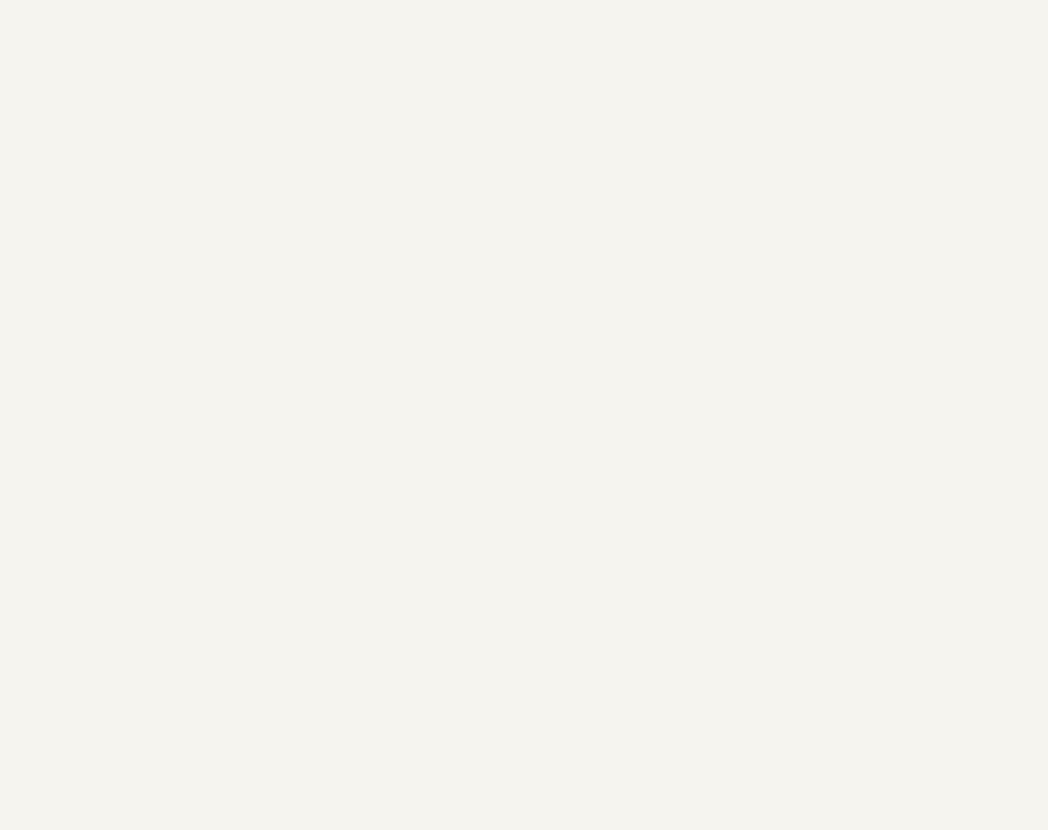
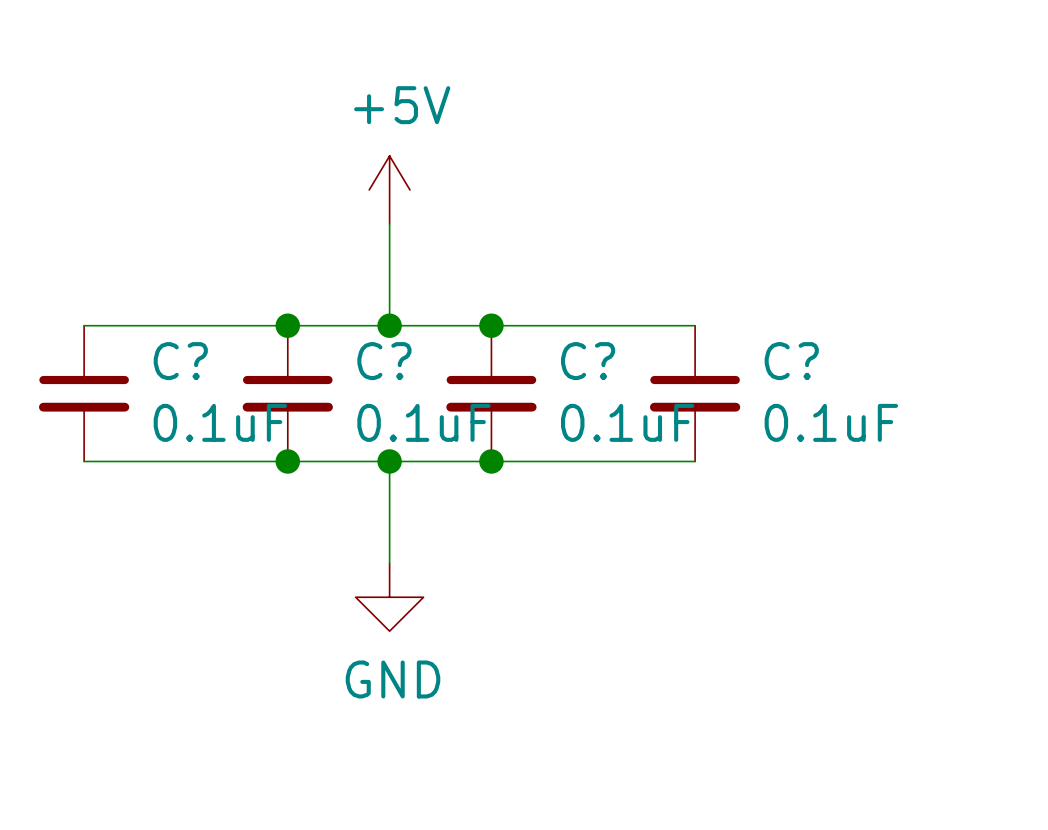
power symbol: none -> +5V (389, 189)
wire: none -> (389, 223) (389, 325)
wire: none -> (84, 325) (695, 325)
junction: none -> (287, 325)
junction: none -> (389, 325)
junction: none -> (491, 325)
C?: none -> 0.1uF (84, 393)
C?: none -> 0.1uF (287, 393)
C?: none -> 0.1uF (491, 393)
C?: none -> 0.1uF (695, 393)
wire: none -> (84, 461) (695, 461)
junction: none -> (287, 461)
wire: none -> (389, 461) (389, 563)
junction: none -> (389, 461)
junction: none -> (491, 461)
power symbol: none -> GND (389, 597)

